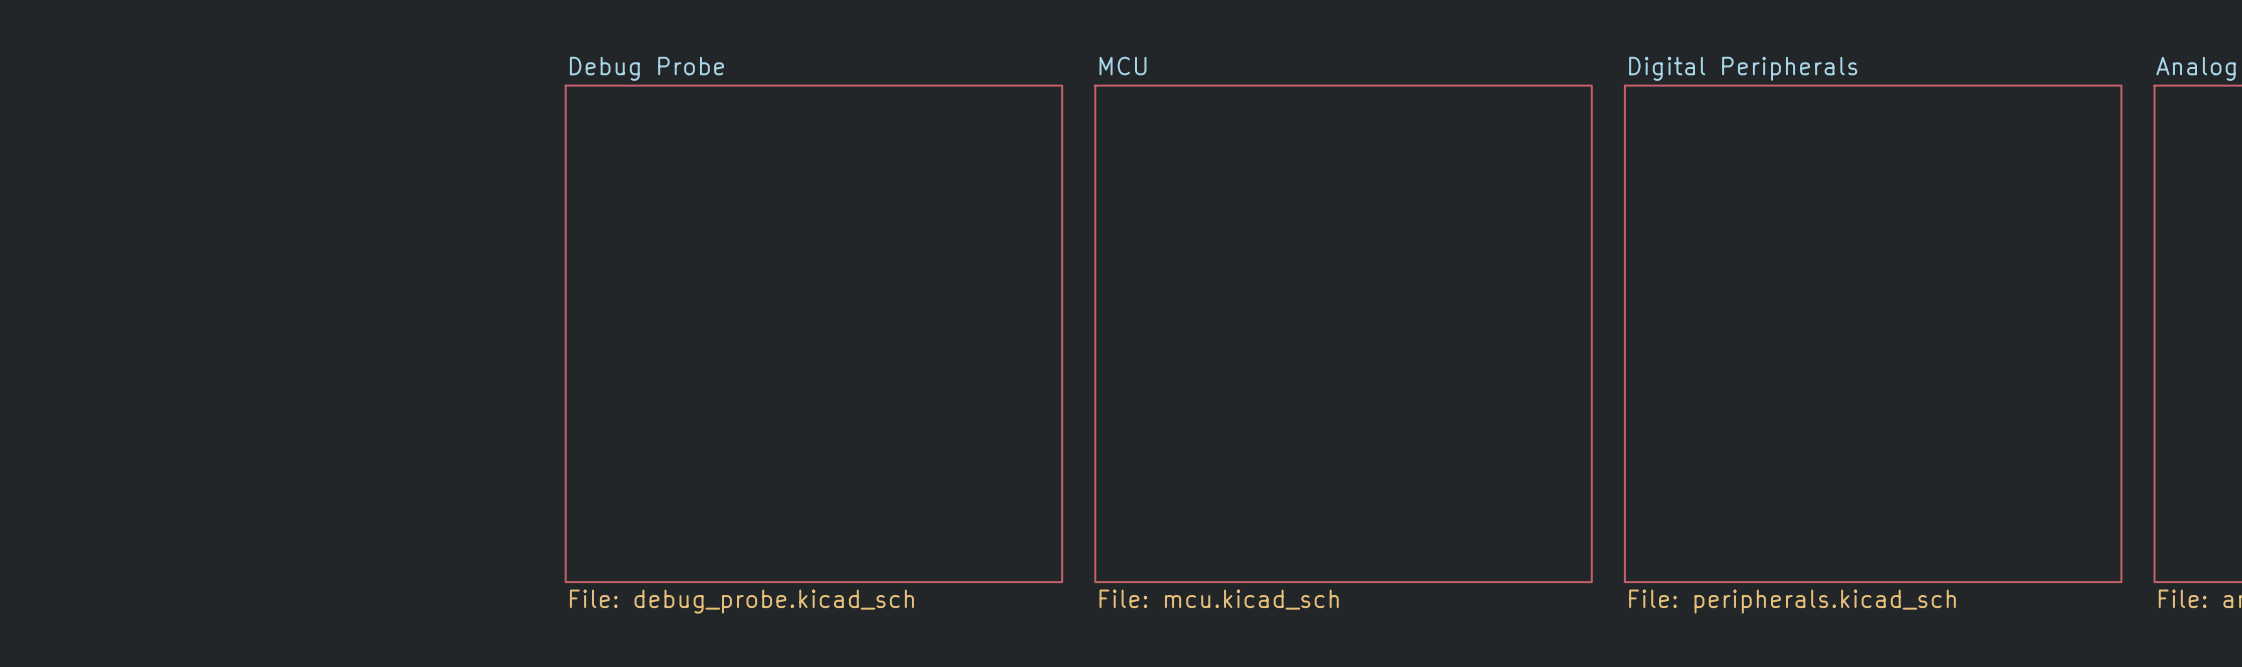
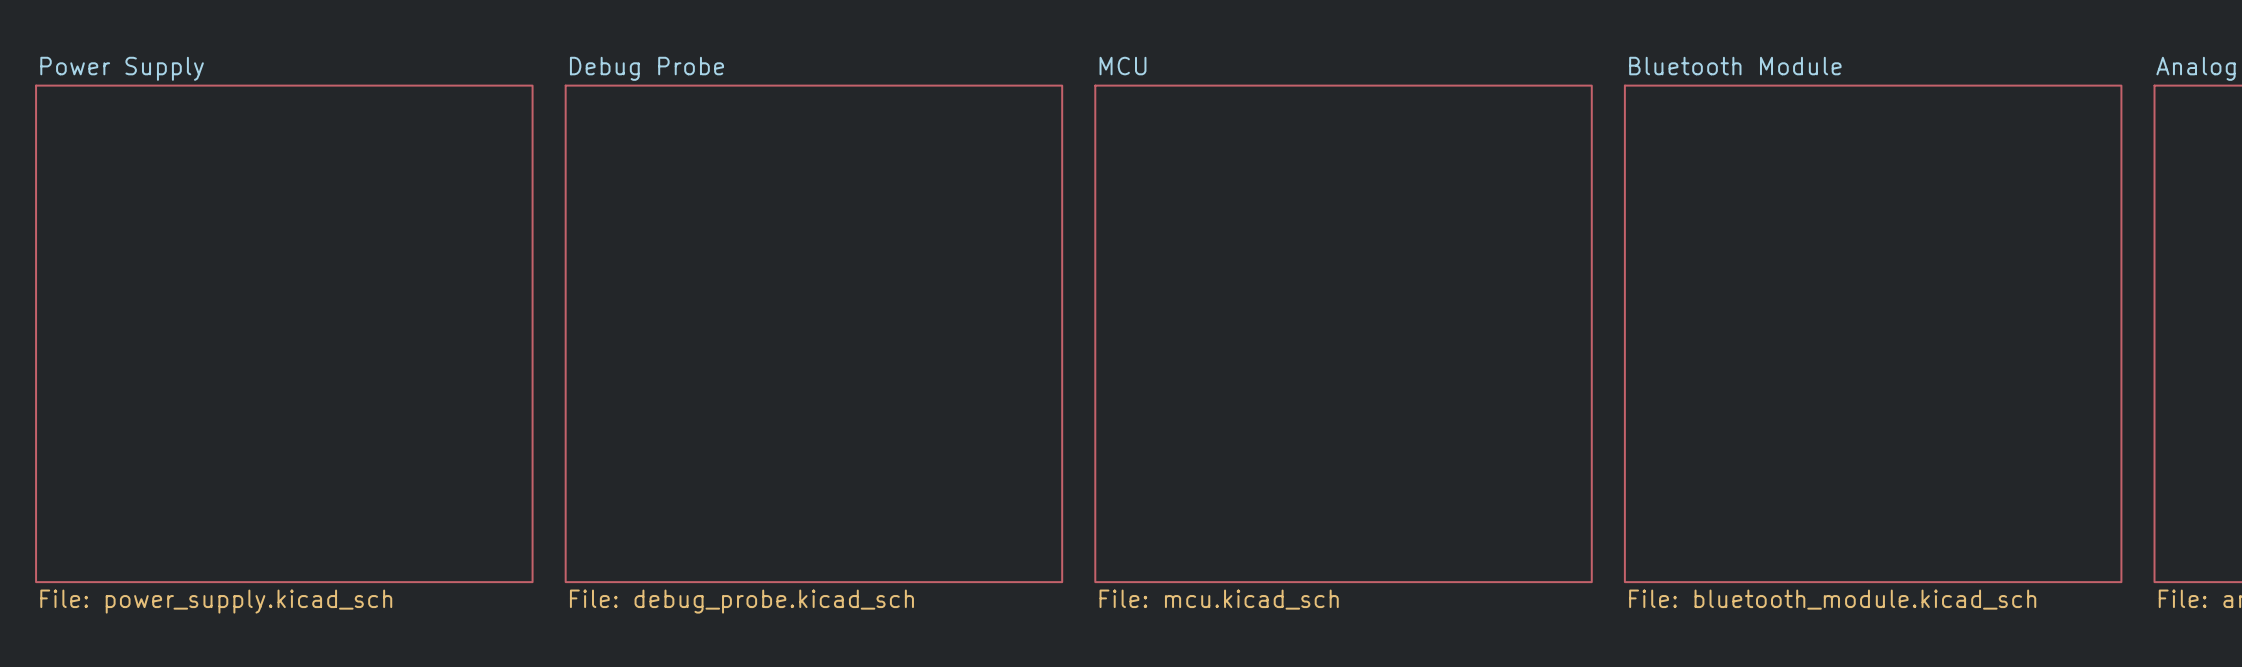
sheet Digital Peripherals name: Digital Peripherals (1743, 68) -> Bluetooth Module (1735, 66)
sheet Power Supply: none -> File: power_supply.kicad_sch (284, 333)
sheet Digital Peripherals value: File: peripherals.kicad_sch (1792, 601) -> File: bluetooth_module.kicad_sch (1832, 599)

